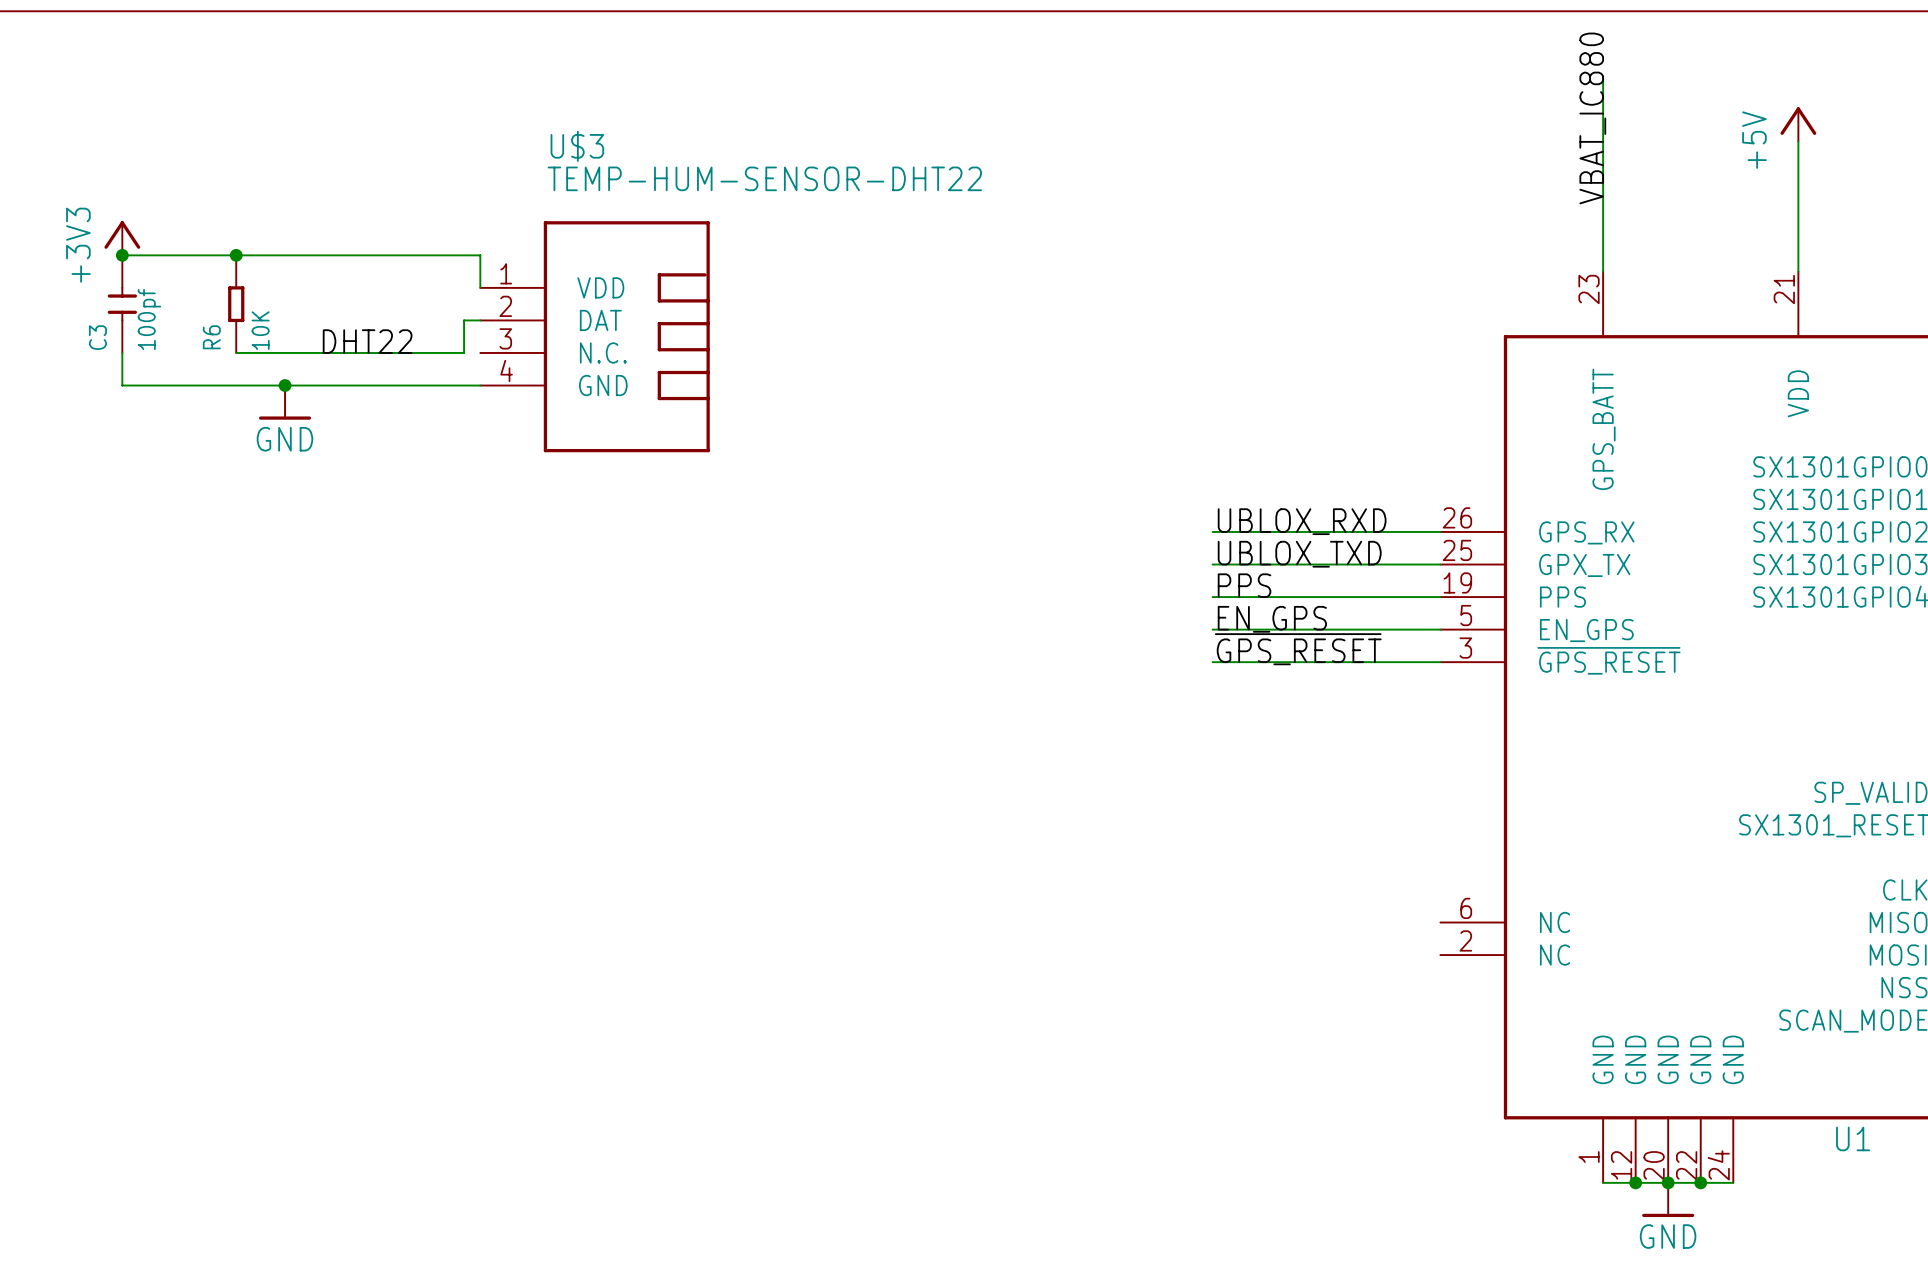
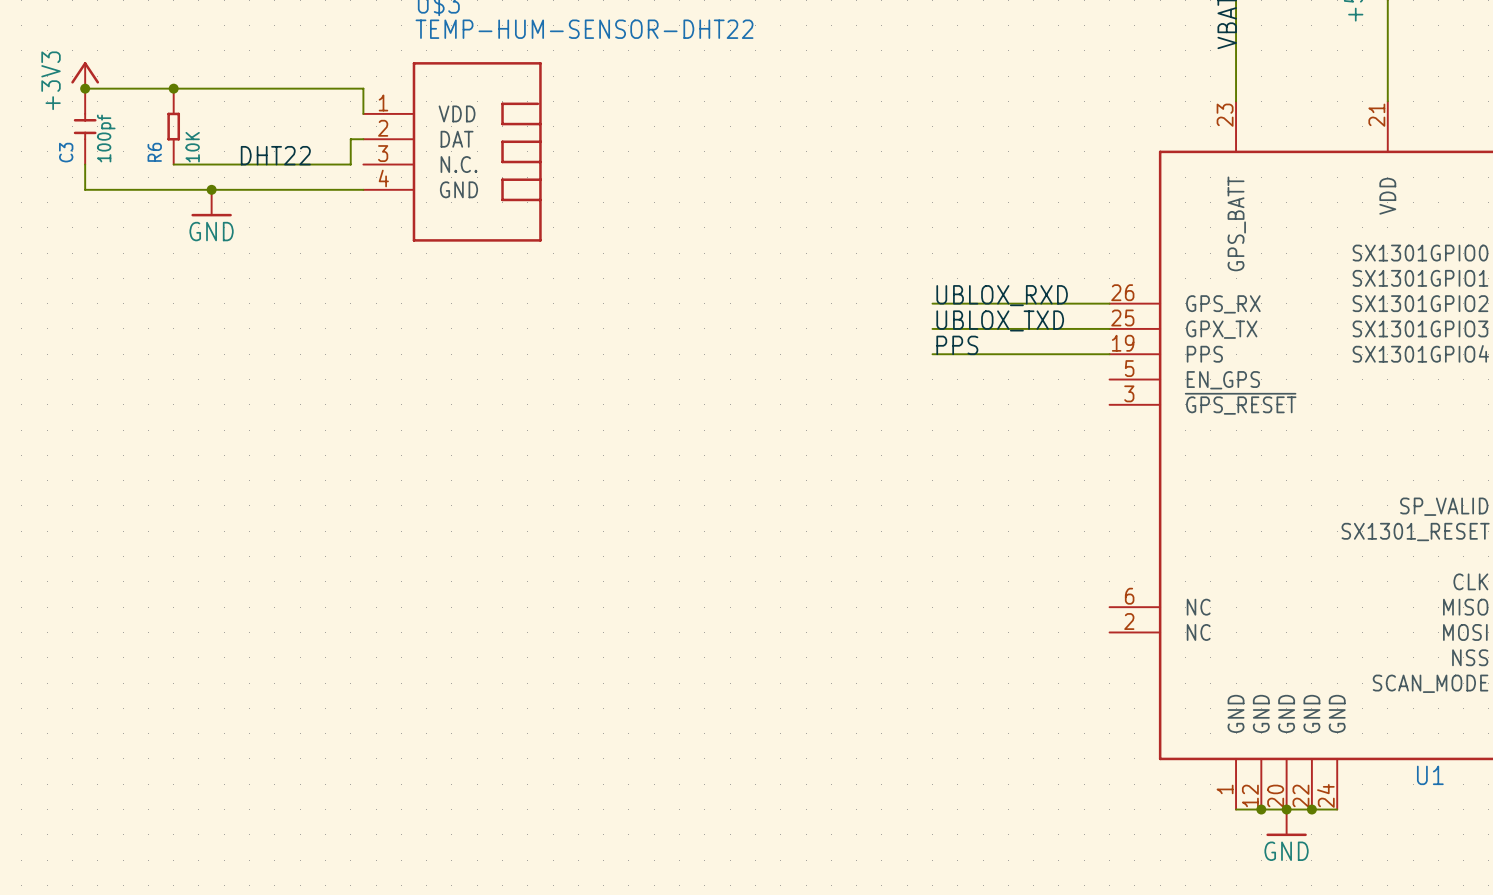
label: EN_GPS (1272, 619) -> none
wire: (1212, 629) (1440, 629) -> none
label: ~{GPS_RESET} (1298, 649) -> none
wire: (1212, 662) (1440, 662) -> none

